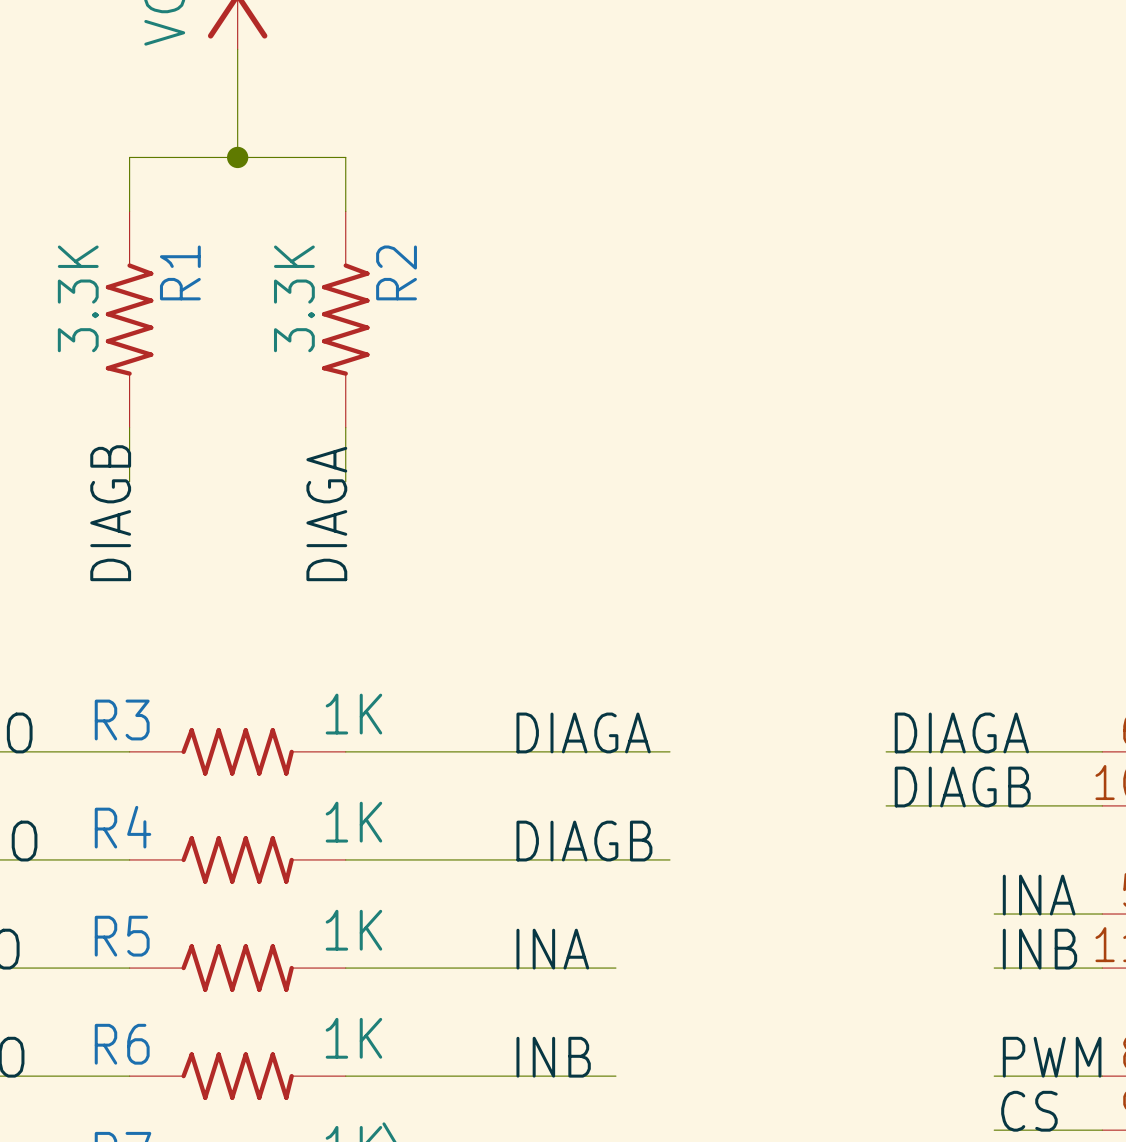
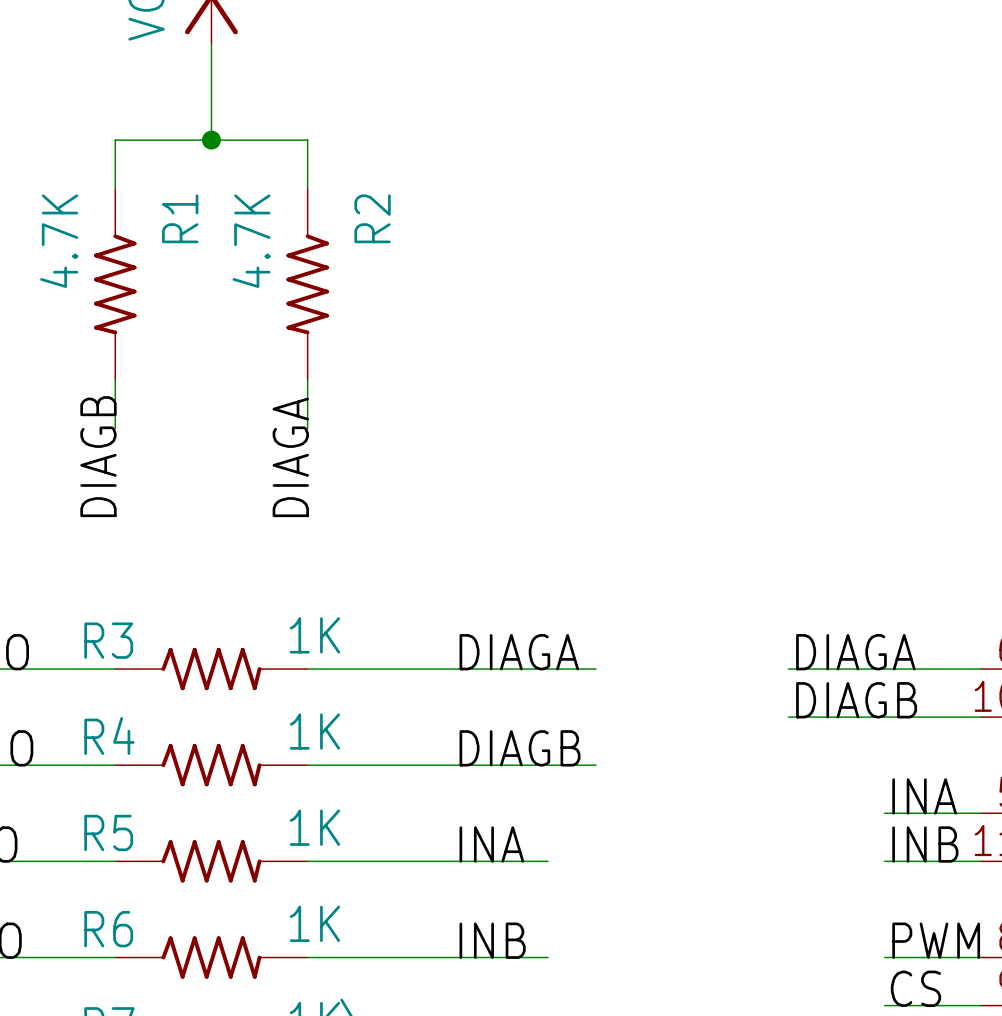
R1 name position: R1 (180, 272) -> R1 (180, 218)
R2 name position: R2 (396, 272) -> R2 (372, 218)
R1 value: 3.3K (78, 298) -> 4.7K (59, 241)
R2 value: 3.3K (294, 298) -> 4.7K (251, 241)

